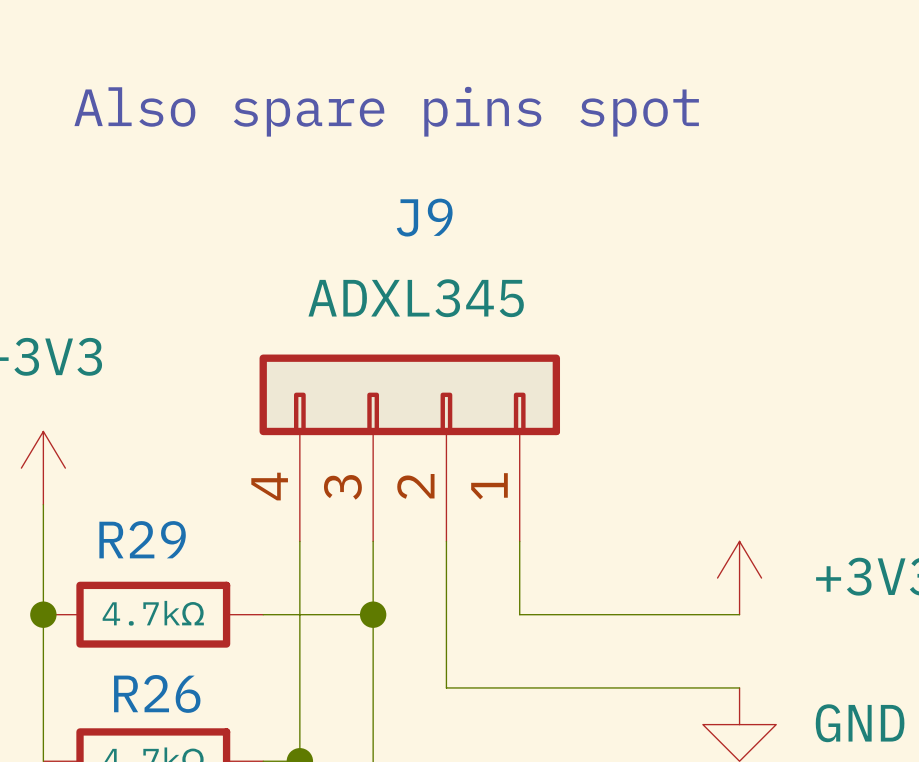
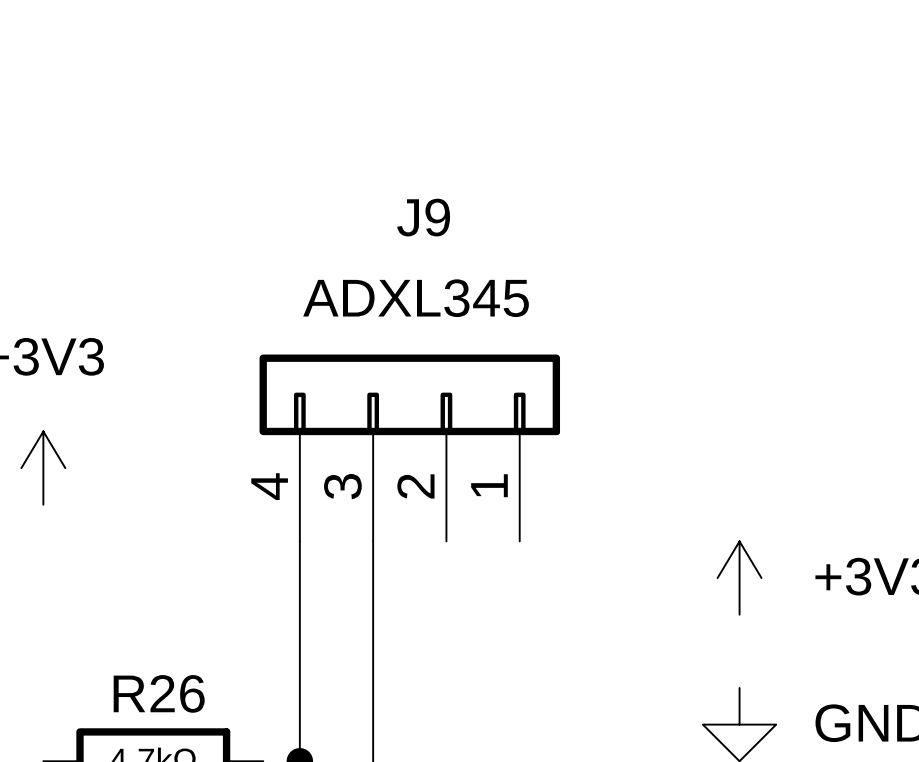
text: Also spare pins spot (386, 111) -> none
wire: (43, 504) (43, 761) -> none
wire: (446, 541) (446, 687) (739, 687) -> none
wire: (519, 541) (519, 614) (739, 614) -> none
junction: (43, 614) -> none
R29: 4.7kΩ (153, 614) -> none
wire: (263, 614) (373, 614) -> none
junction: (373, 614) -> none
wire: (263, 761) (299, 761) -> none

